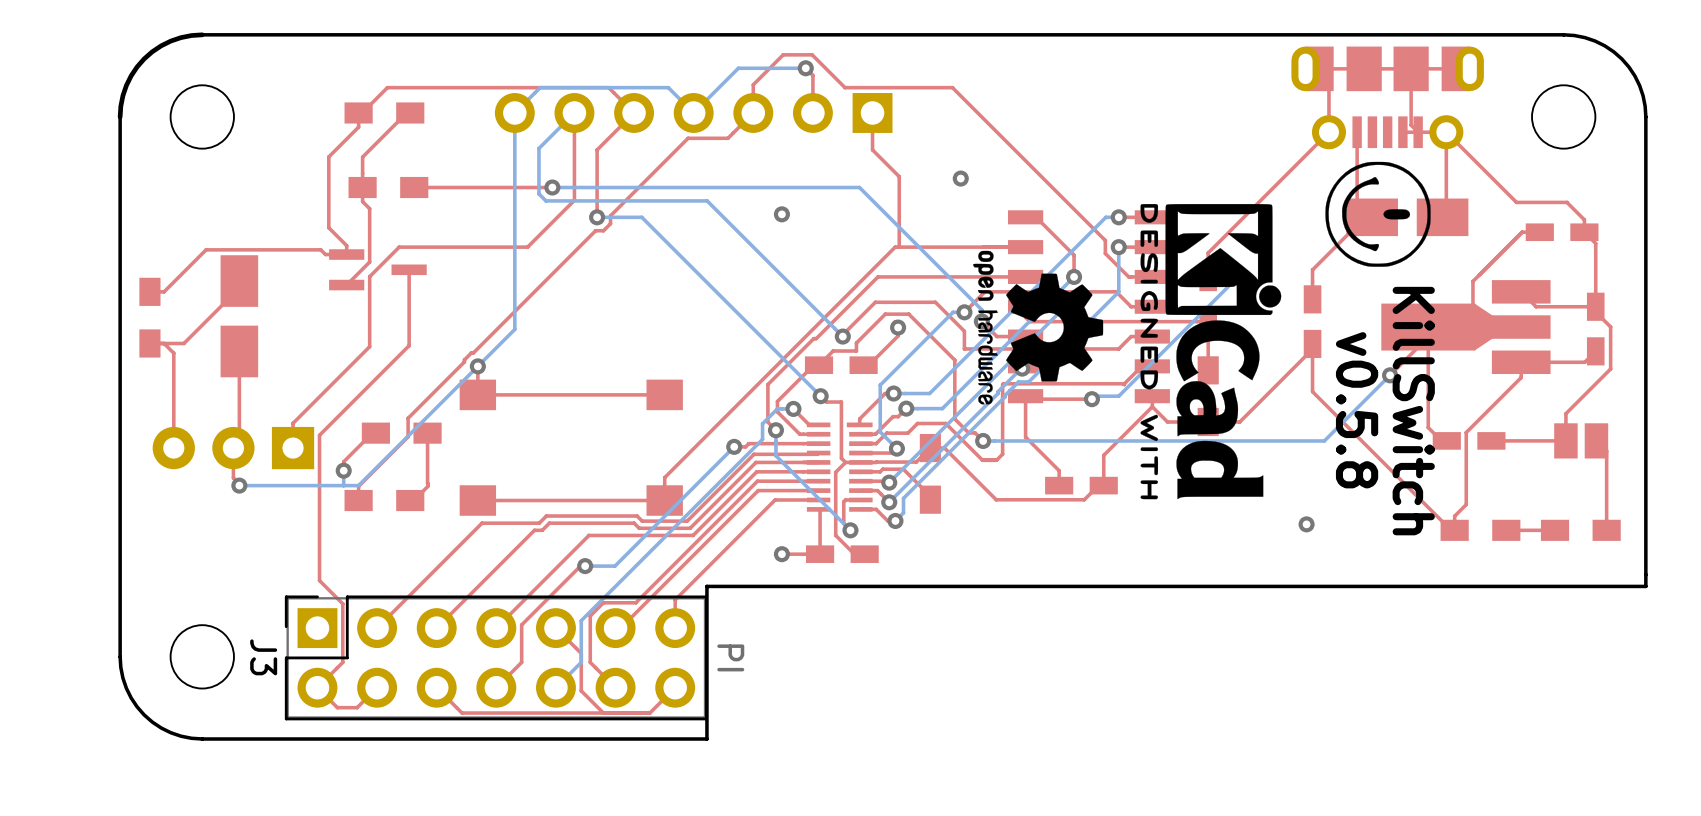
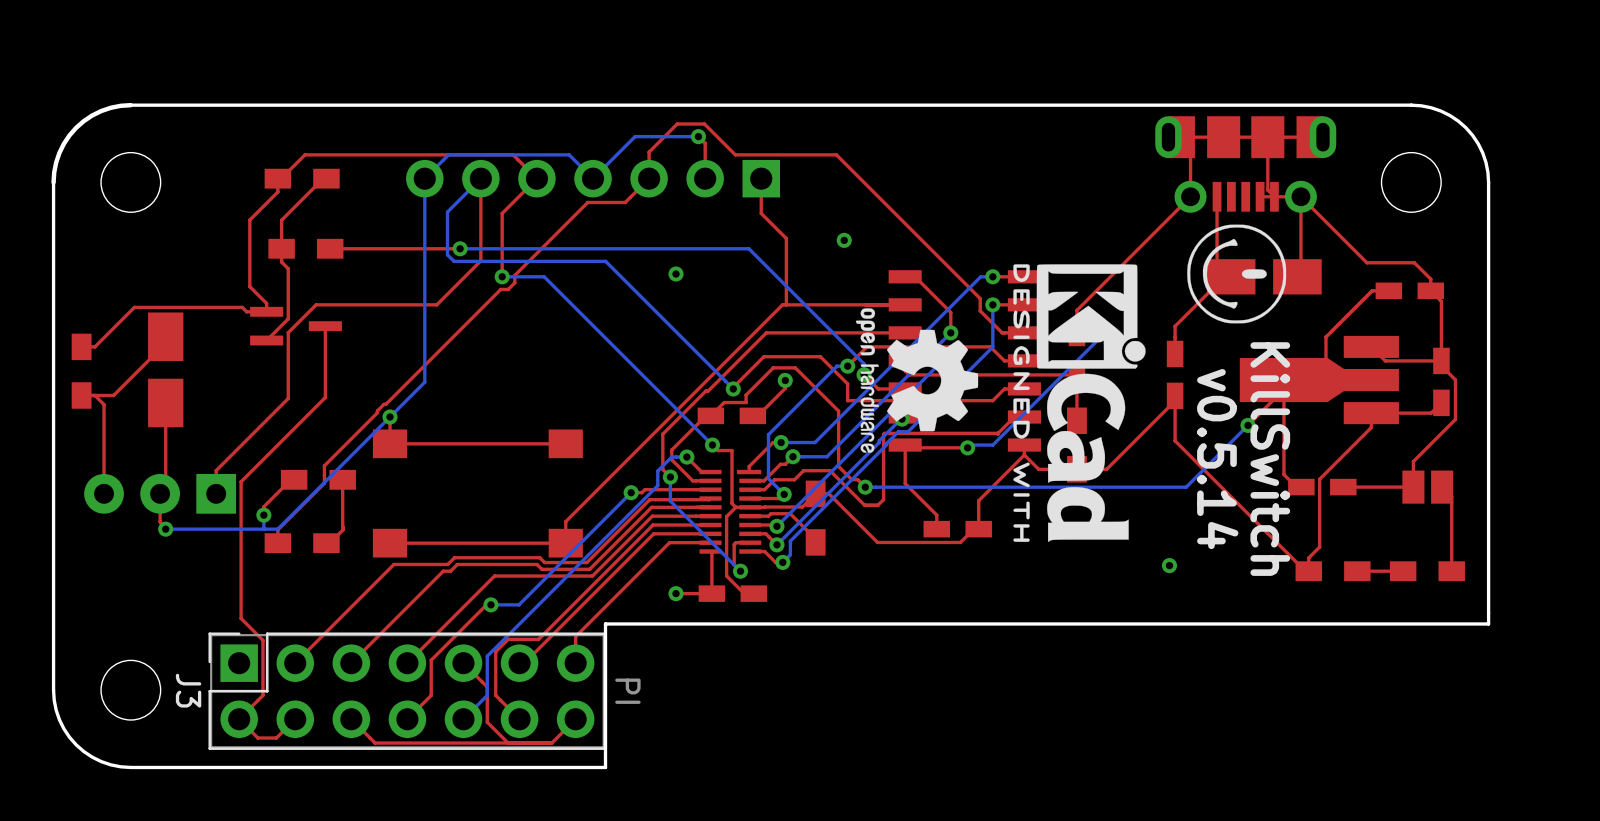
text: v0.5.8 (1357, 410) -> v0.5.14 (1217, 459)

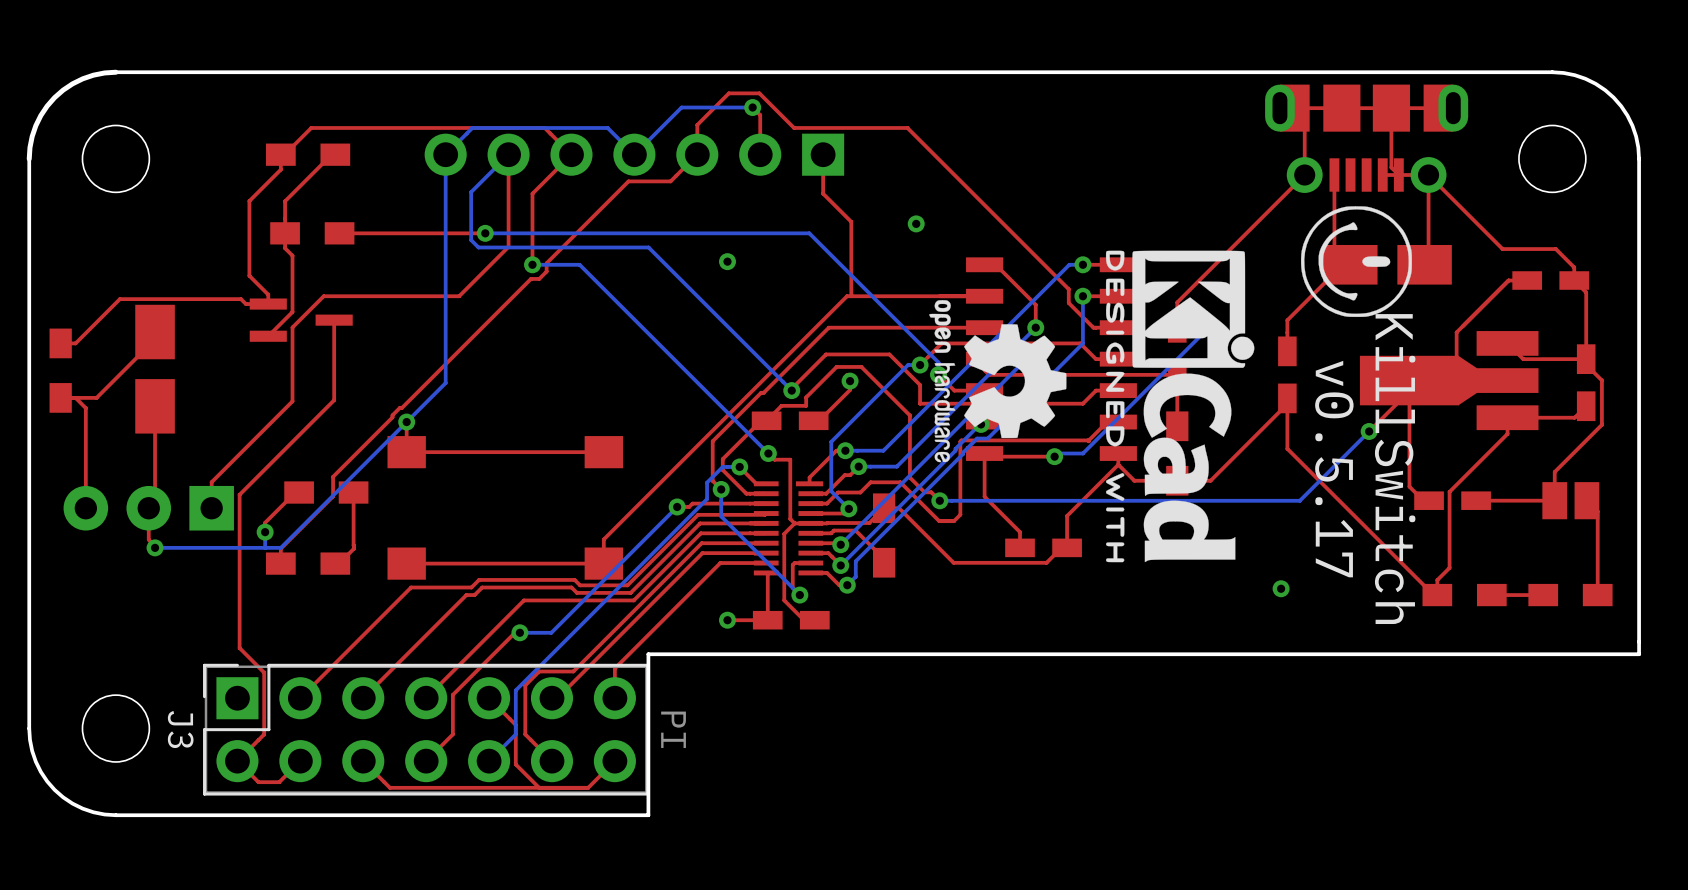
text: v0.5.14 (1217, 459) -> v0.5.17 (1334, 469)

